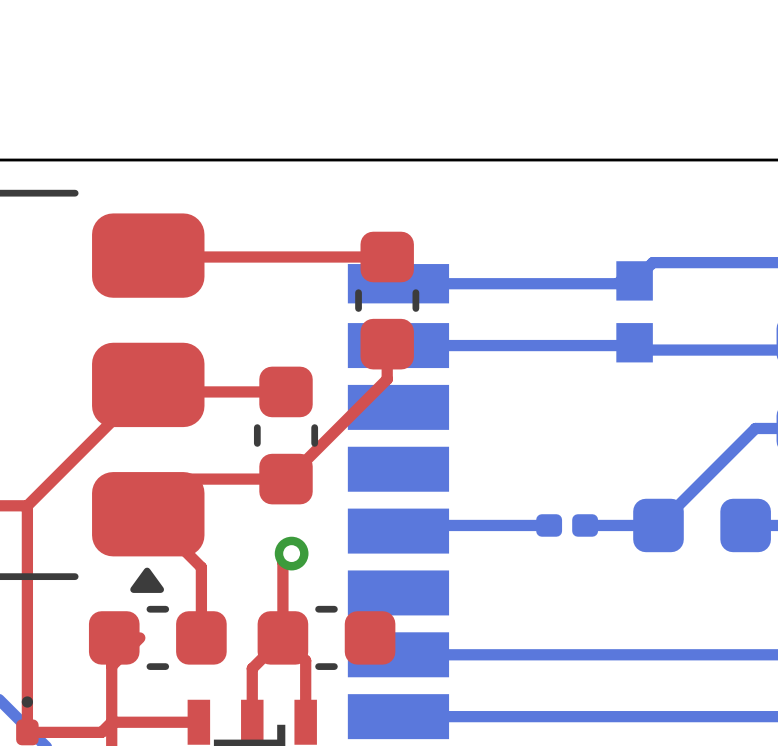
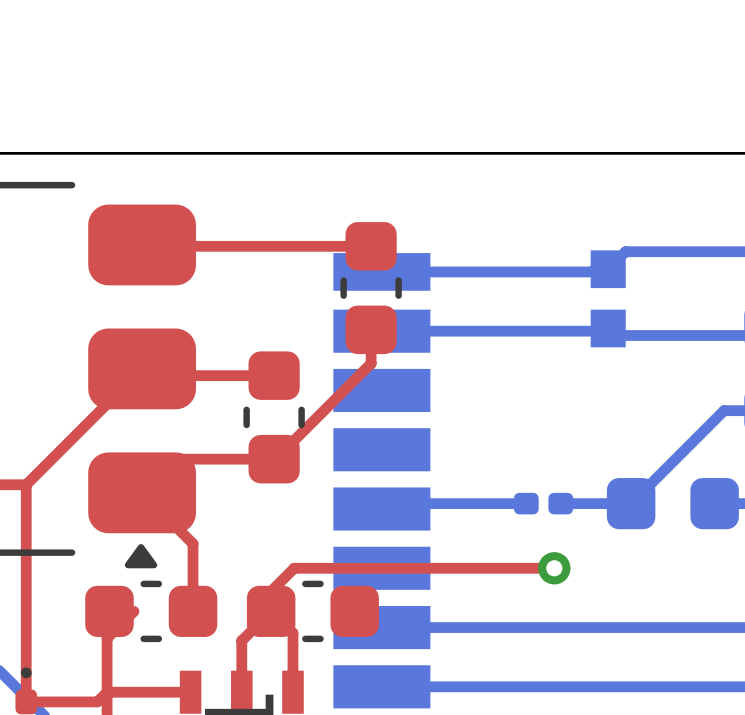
top track: (291, 553) (282, 562) (282, 616) -> (554, 568) (294, 568) (271, 591)
via: (291, 553) -> none
via: none -> (554, 568)

